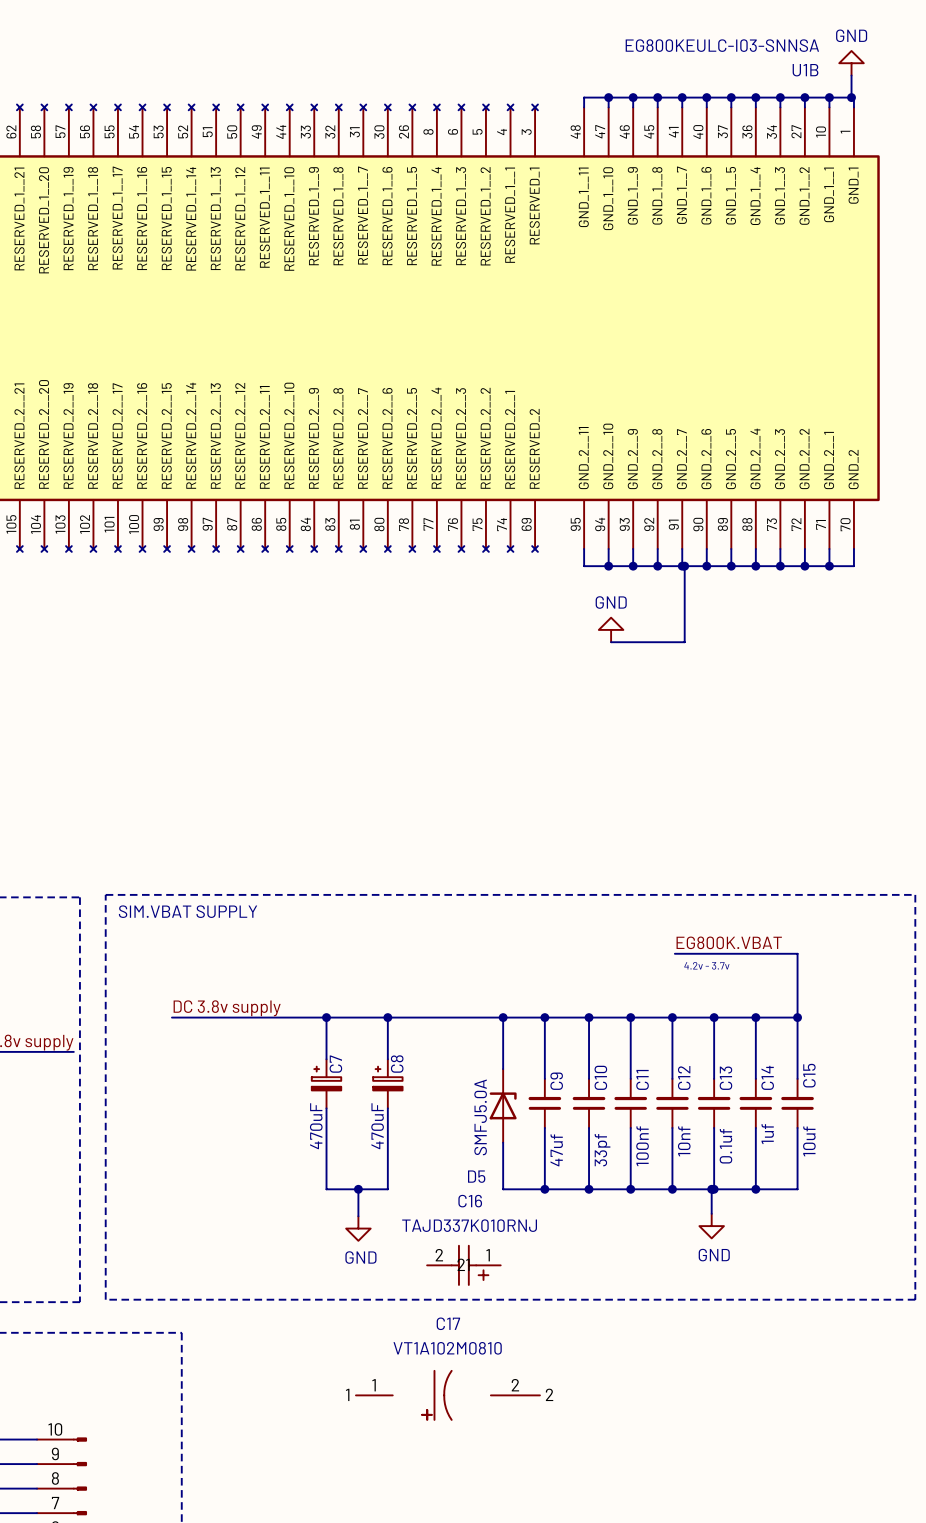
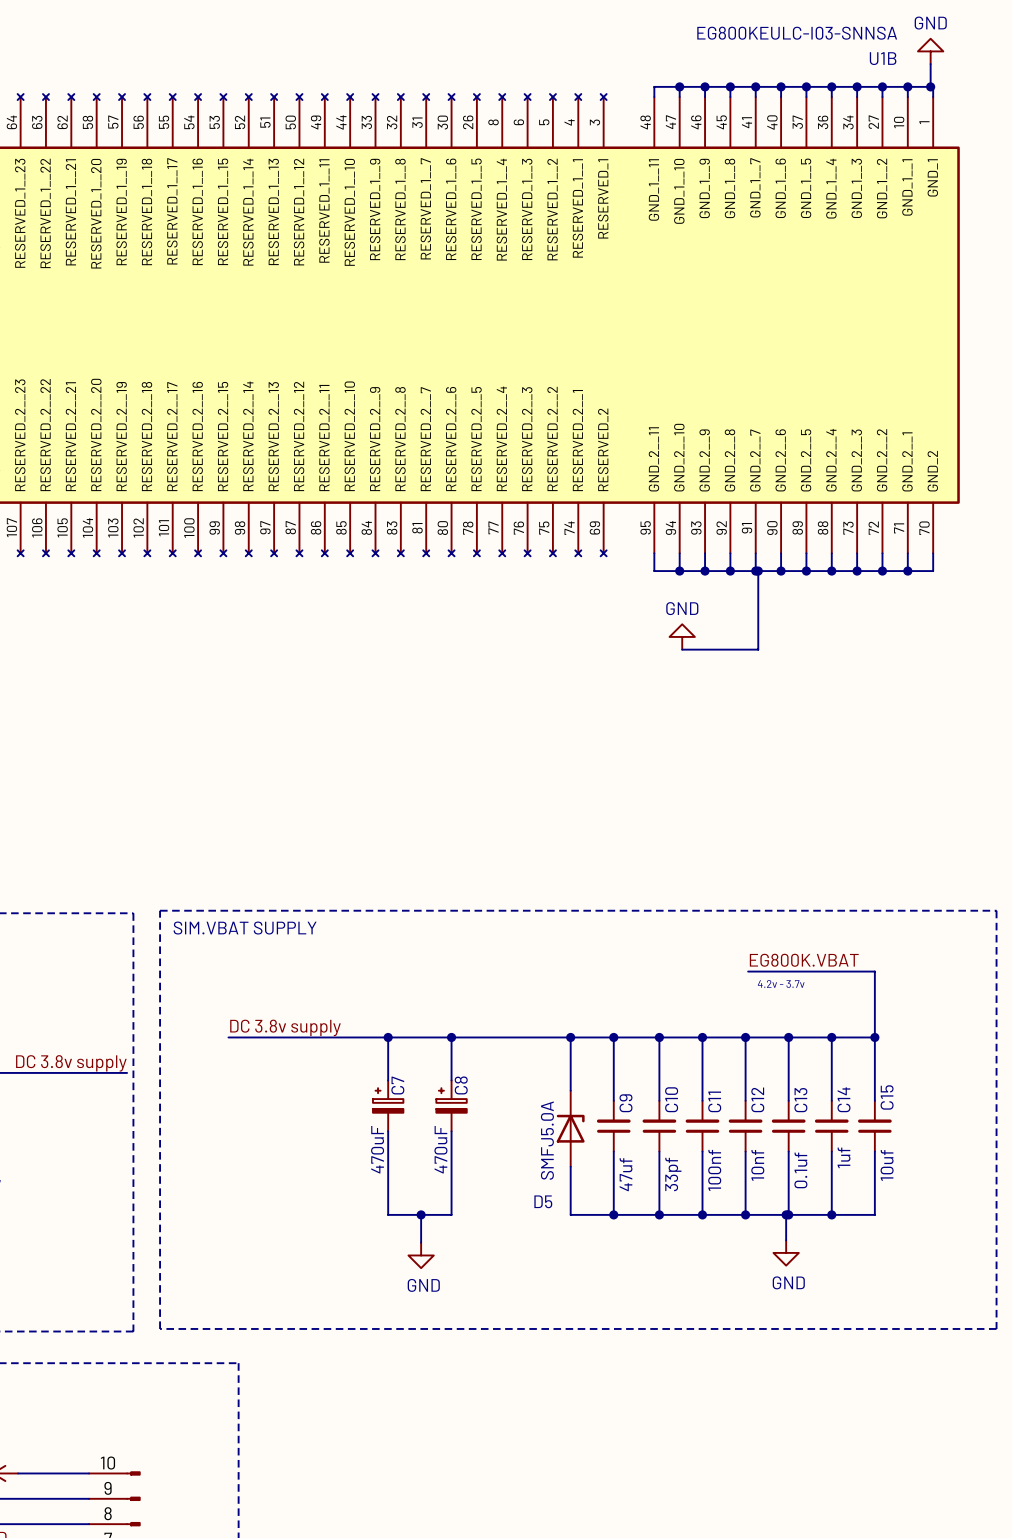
C16: TAJD337K010RNJ (463, 1265) -> none
C17: VT1A102M0810 (447, 1395) -> none

